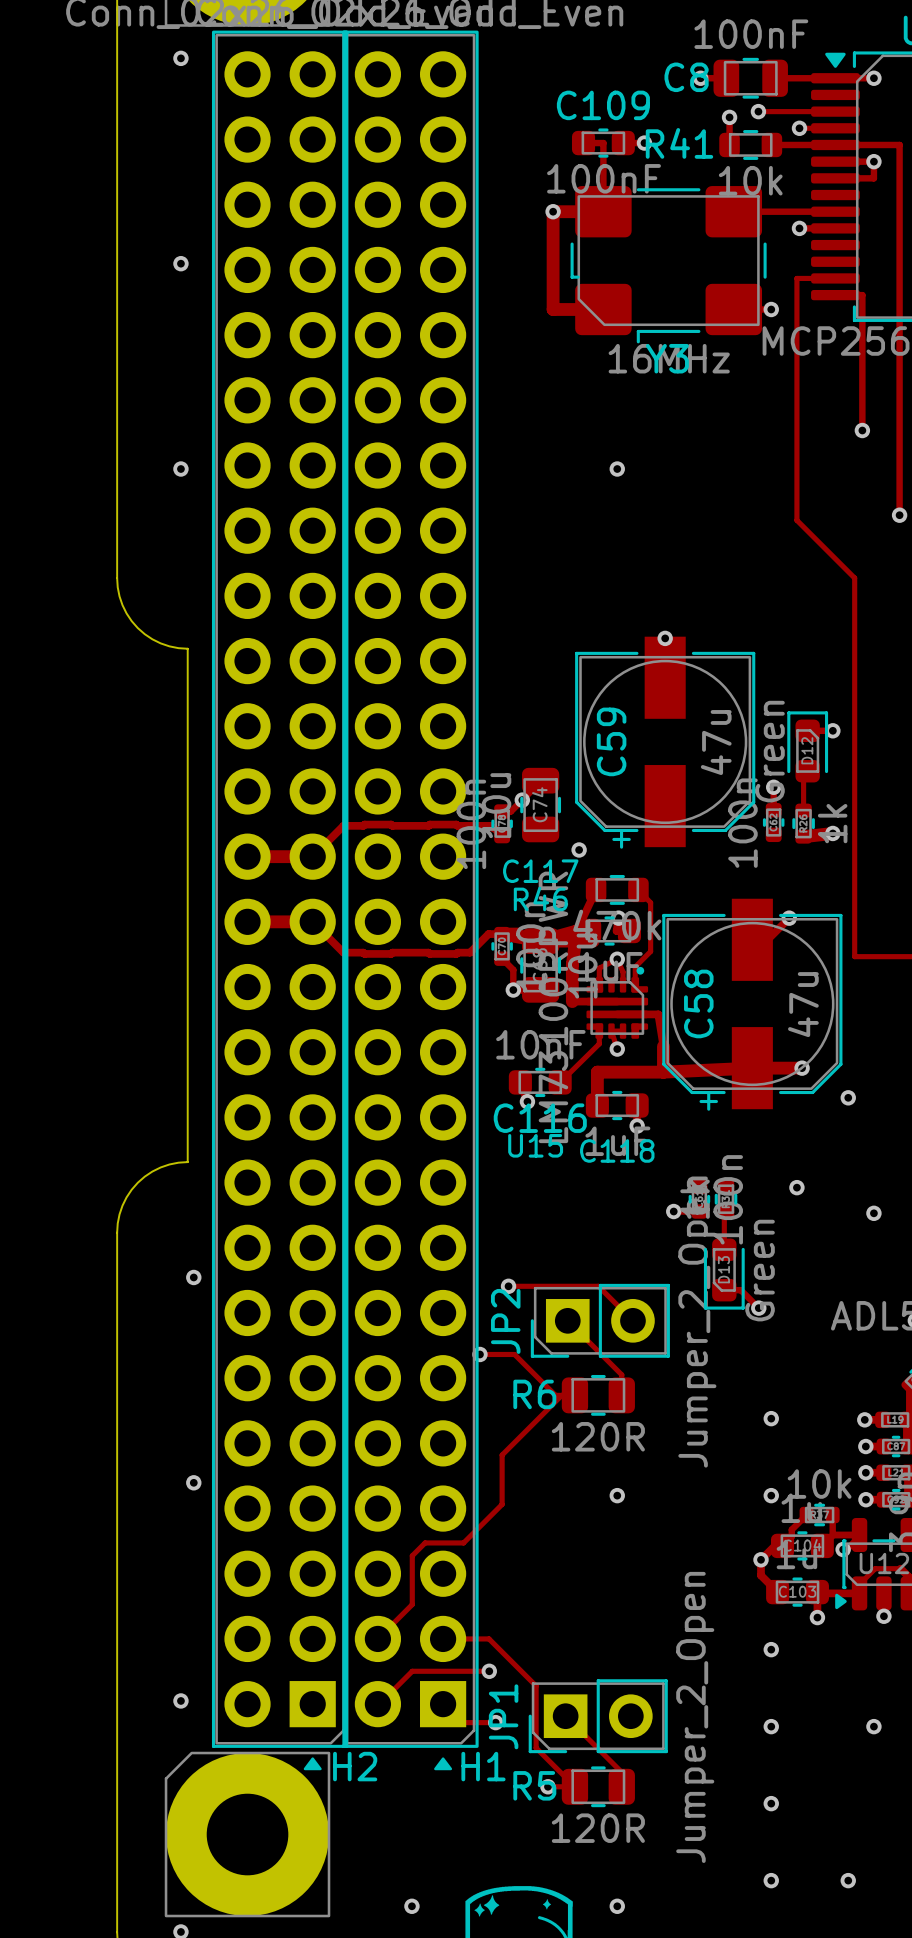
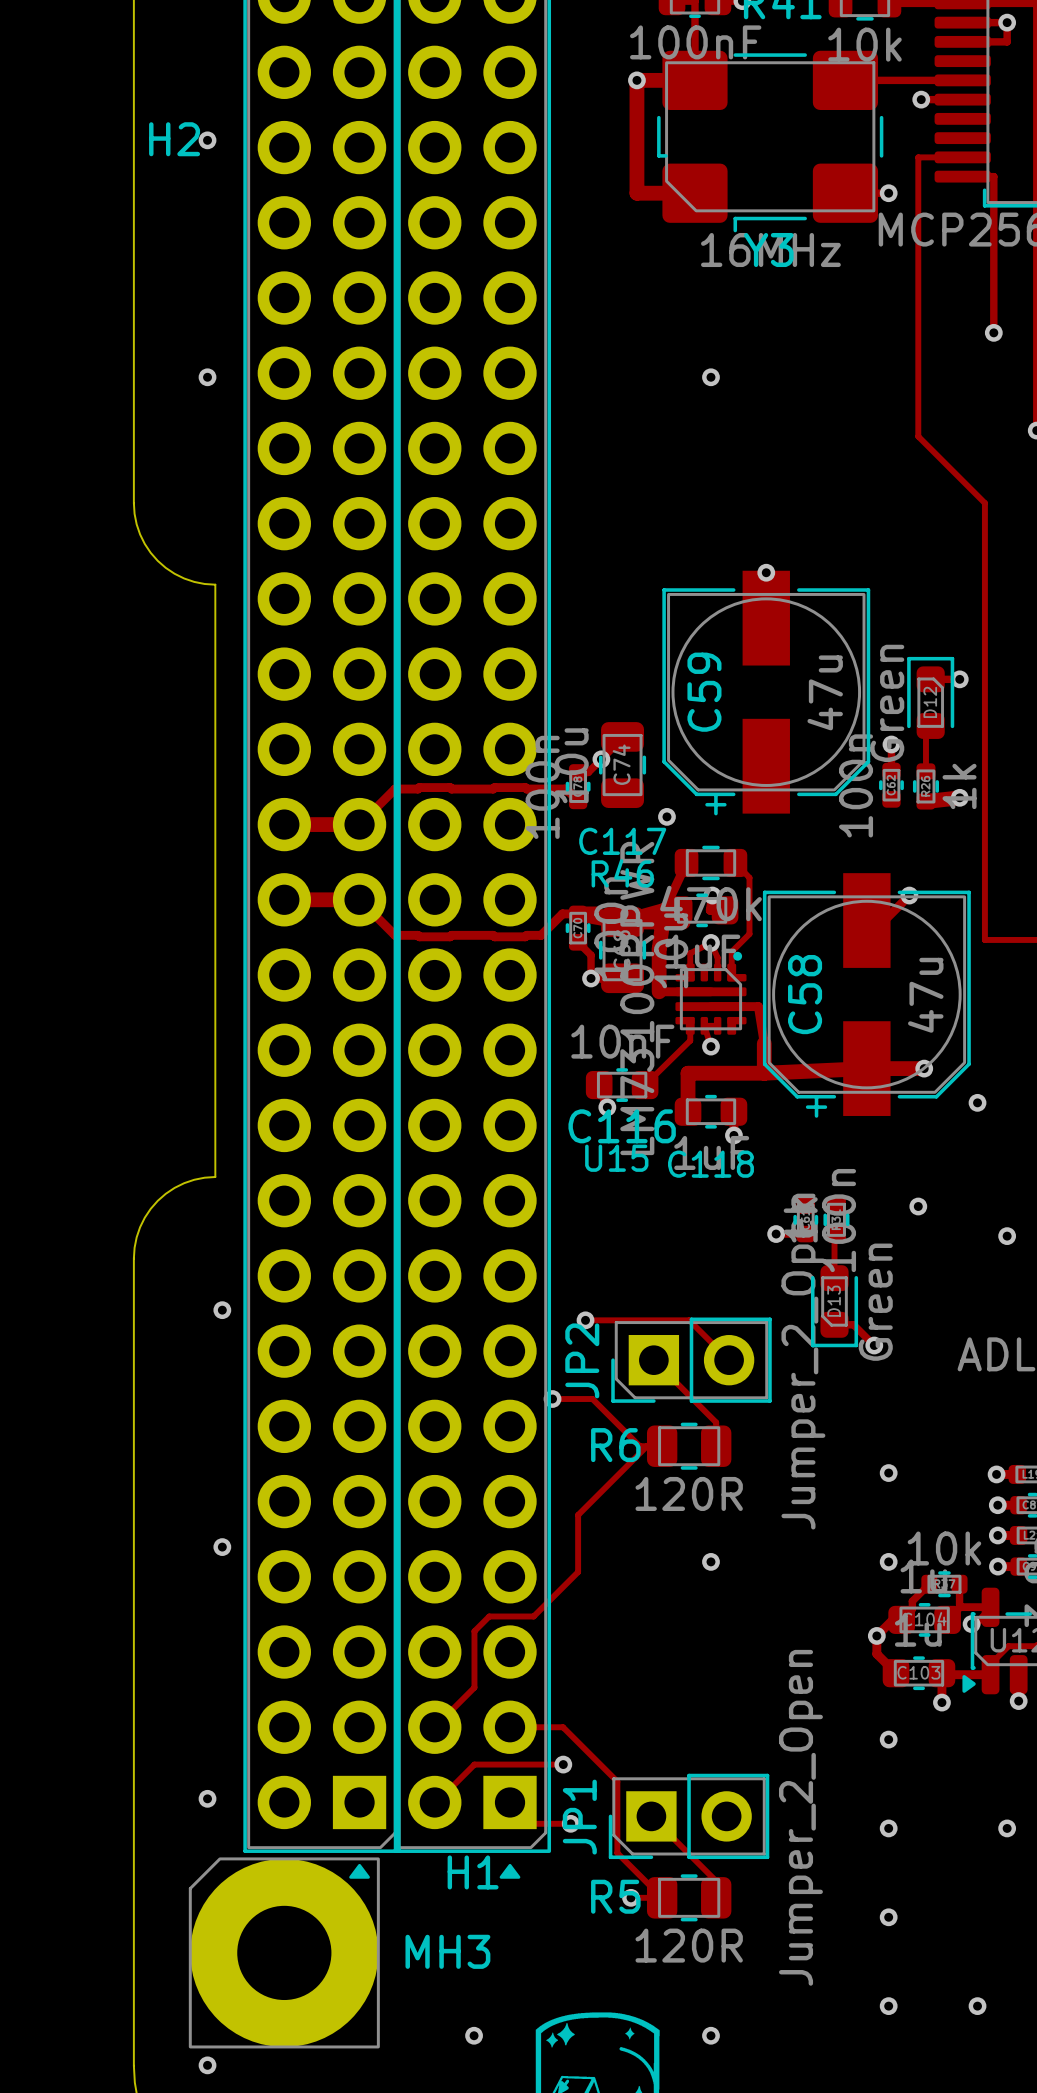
H2 name position: H2 (355, 1766) -> H2 (174, 139)
H1 name position: H1 (483, 1766) -> H1 (473, 1872)
MH3 name: none -> MH3 (447, 1951)

